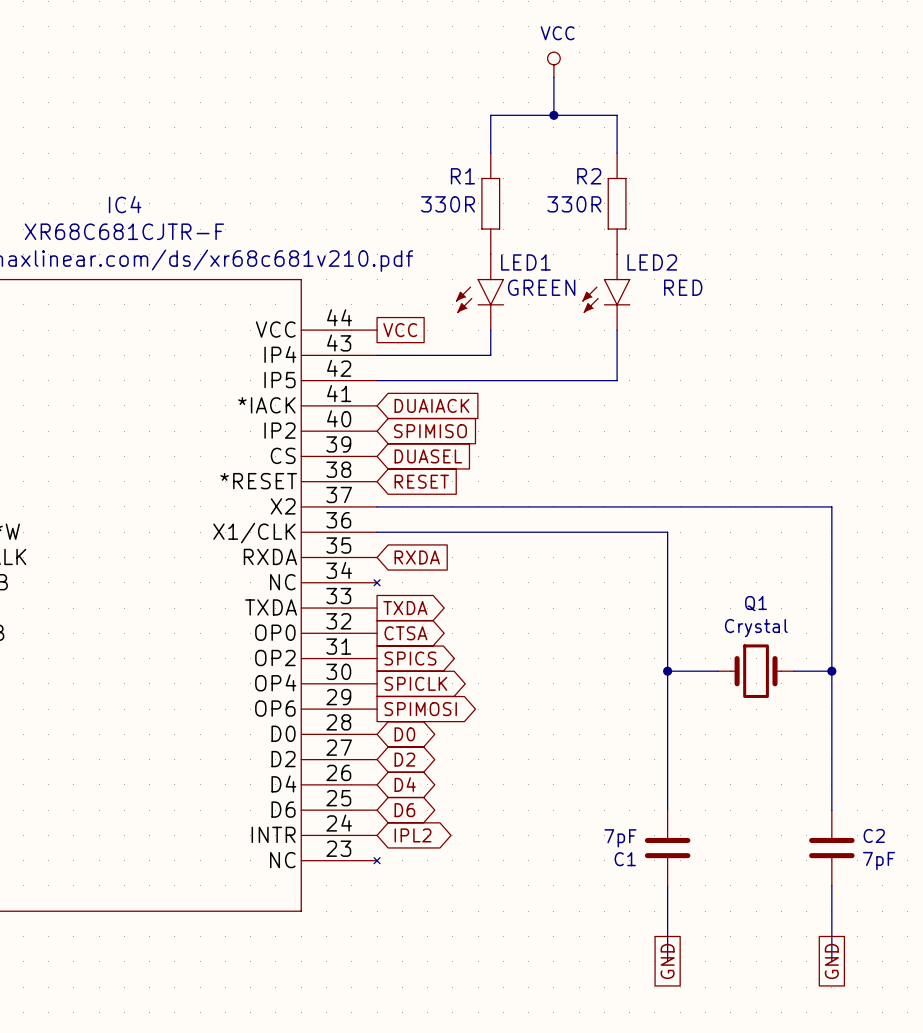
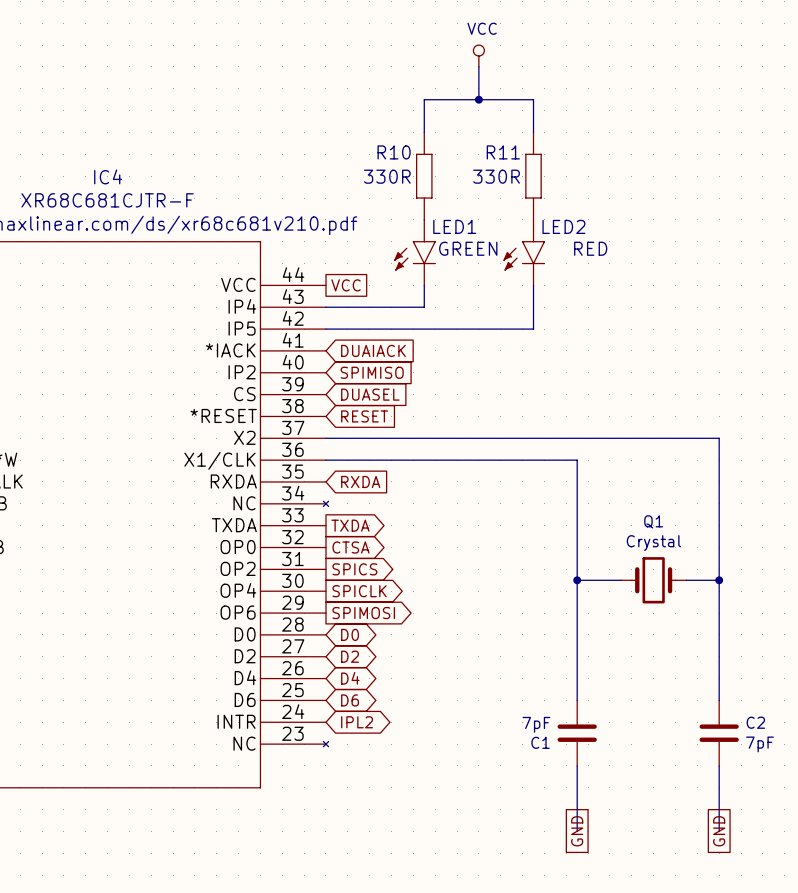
R1 name: R1 (462, 176) -> R10 (394, 152)
R2 name: R2 (589, 176) -> R11 (503, 152)

